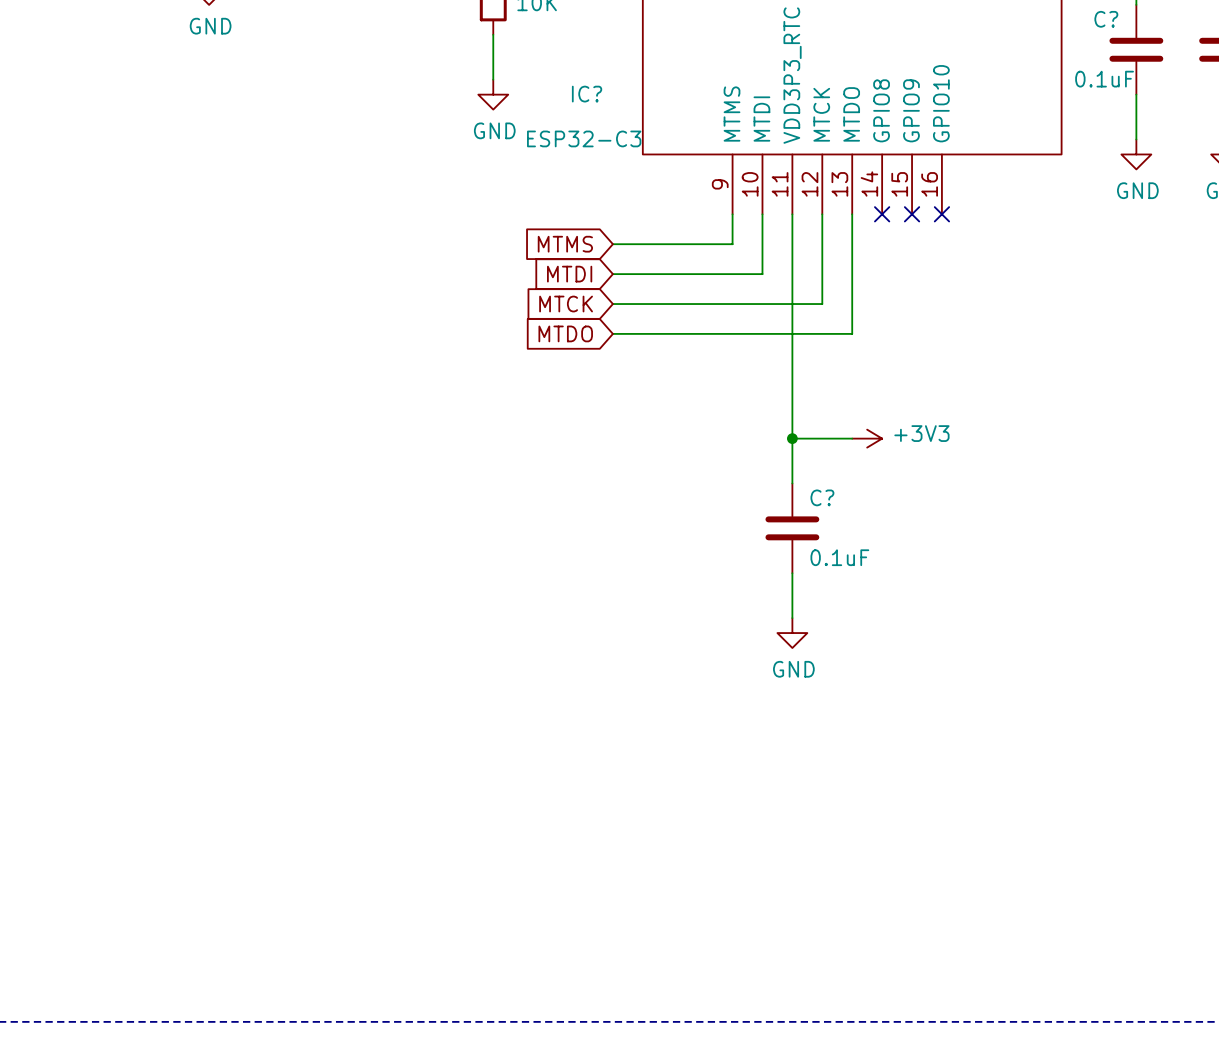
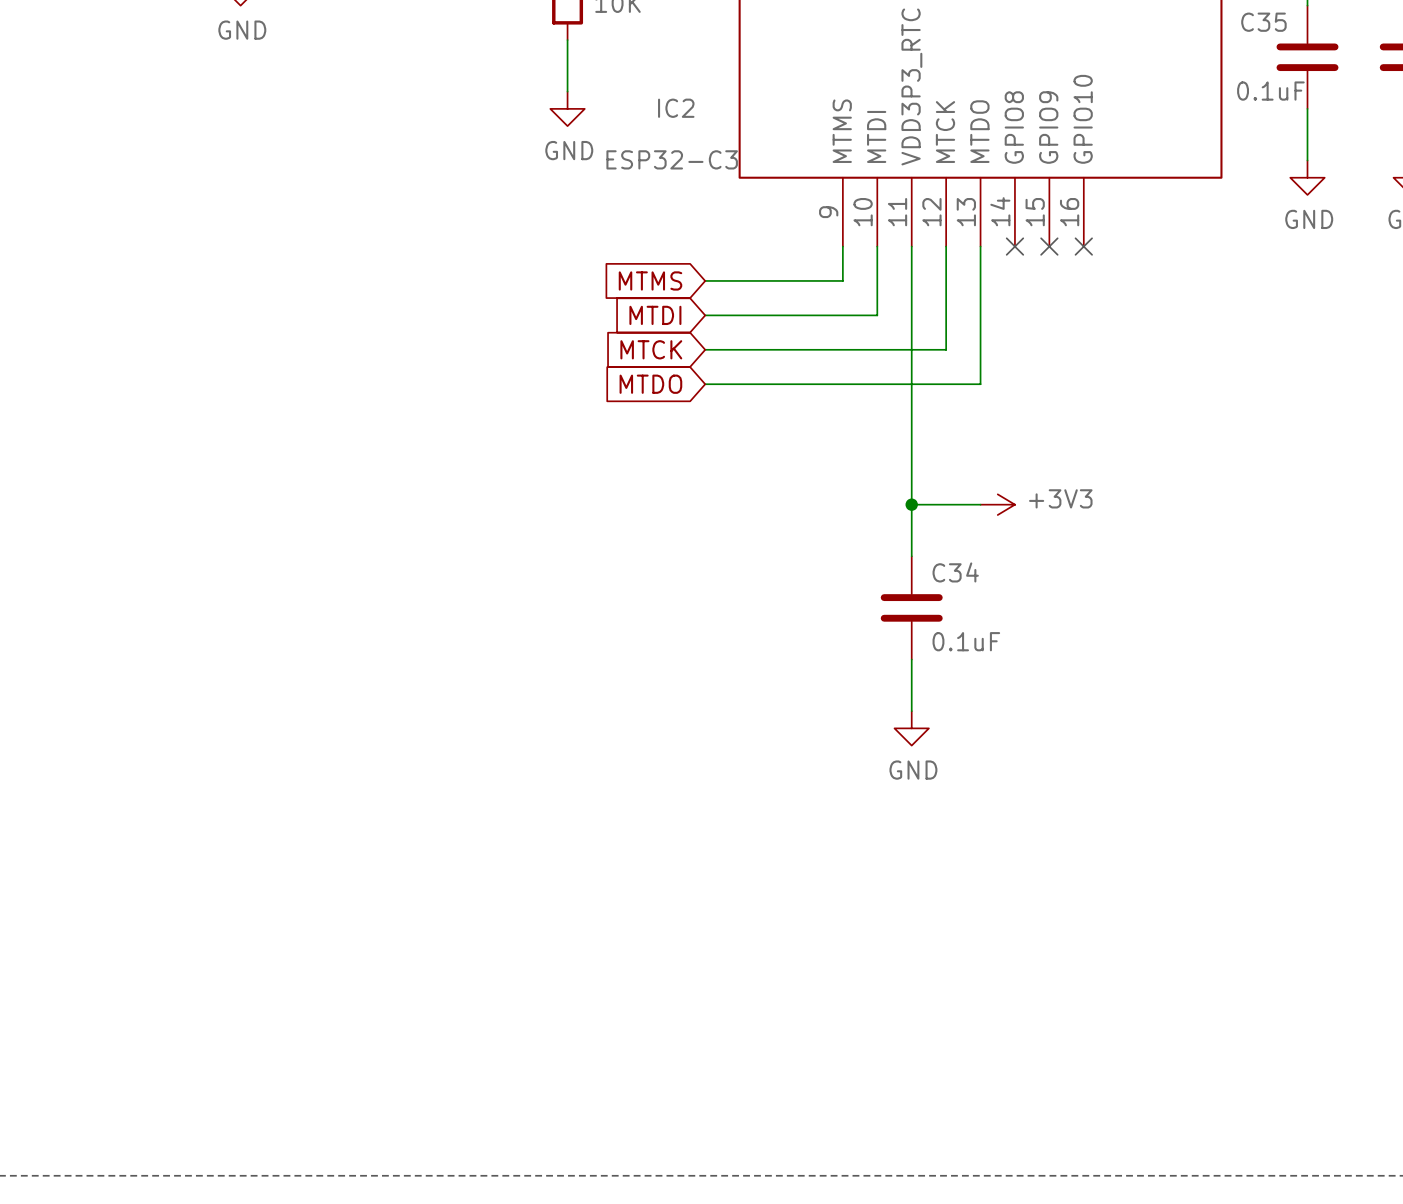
C? name: C? (1106, 19) -> C35 (1263, 22)
IC? name: IC? (587, 94) -> IC2 (676, 108)
C? name: C? (822, 497) -> C34 (955, 572)

